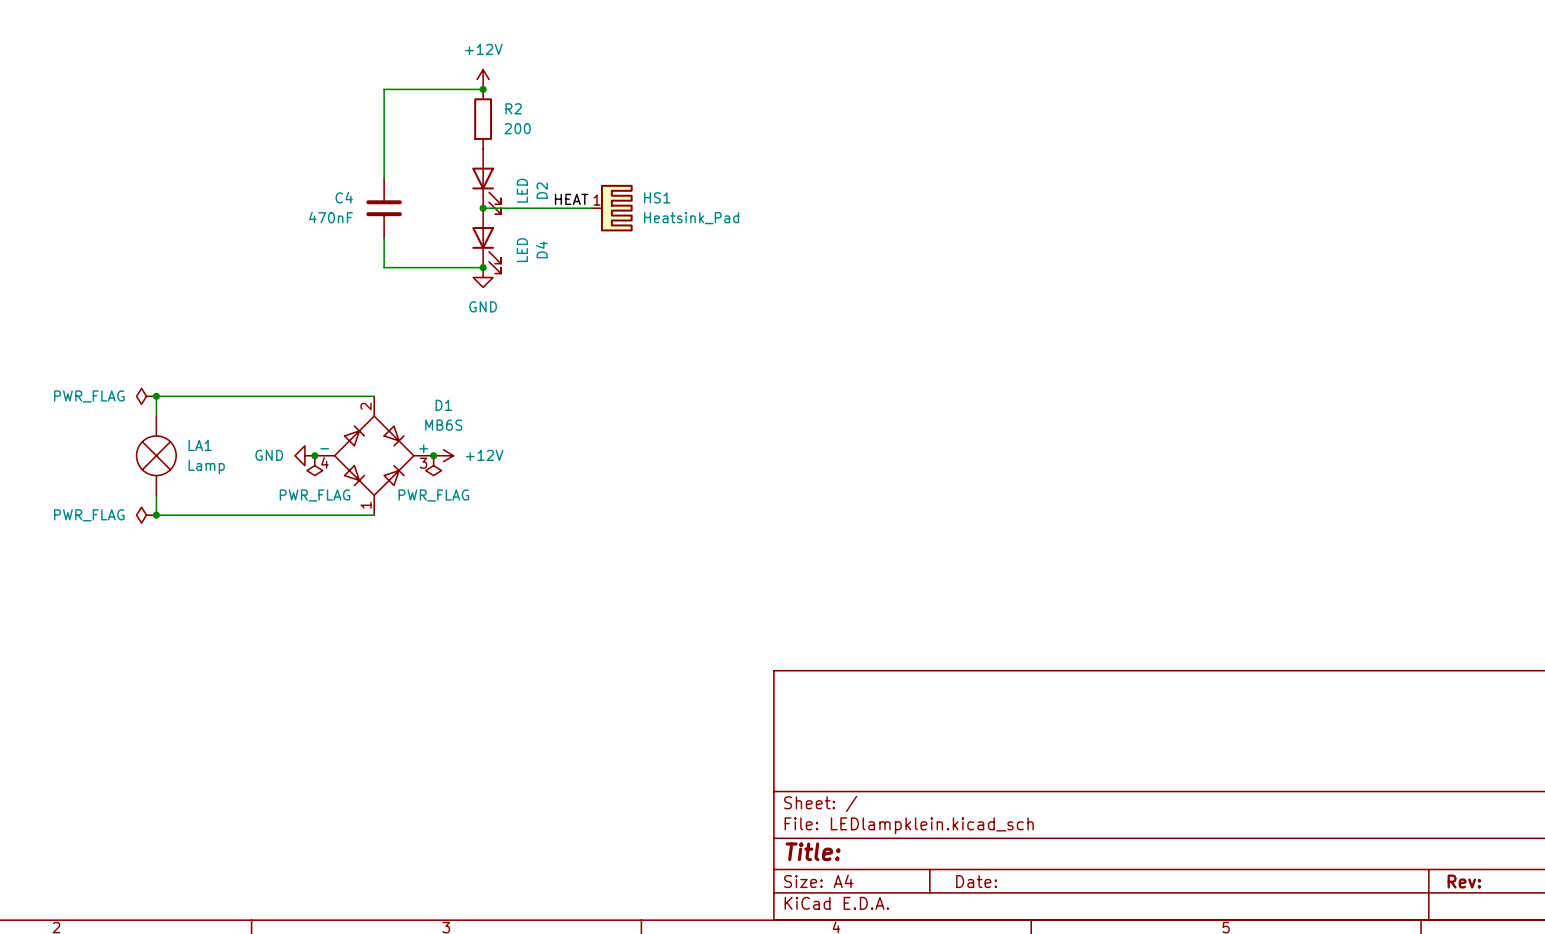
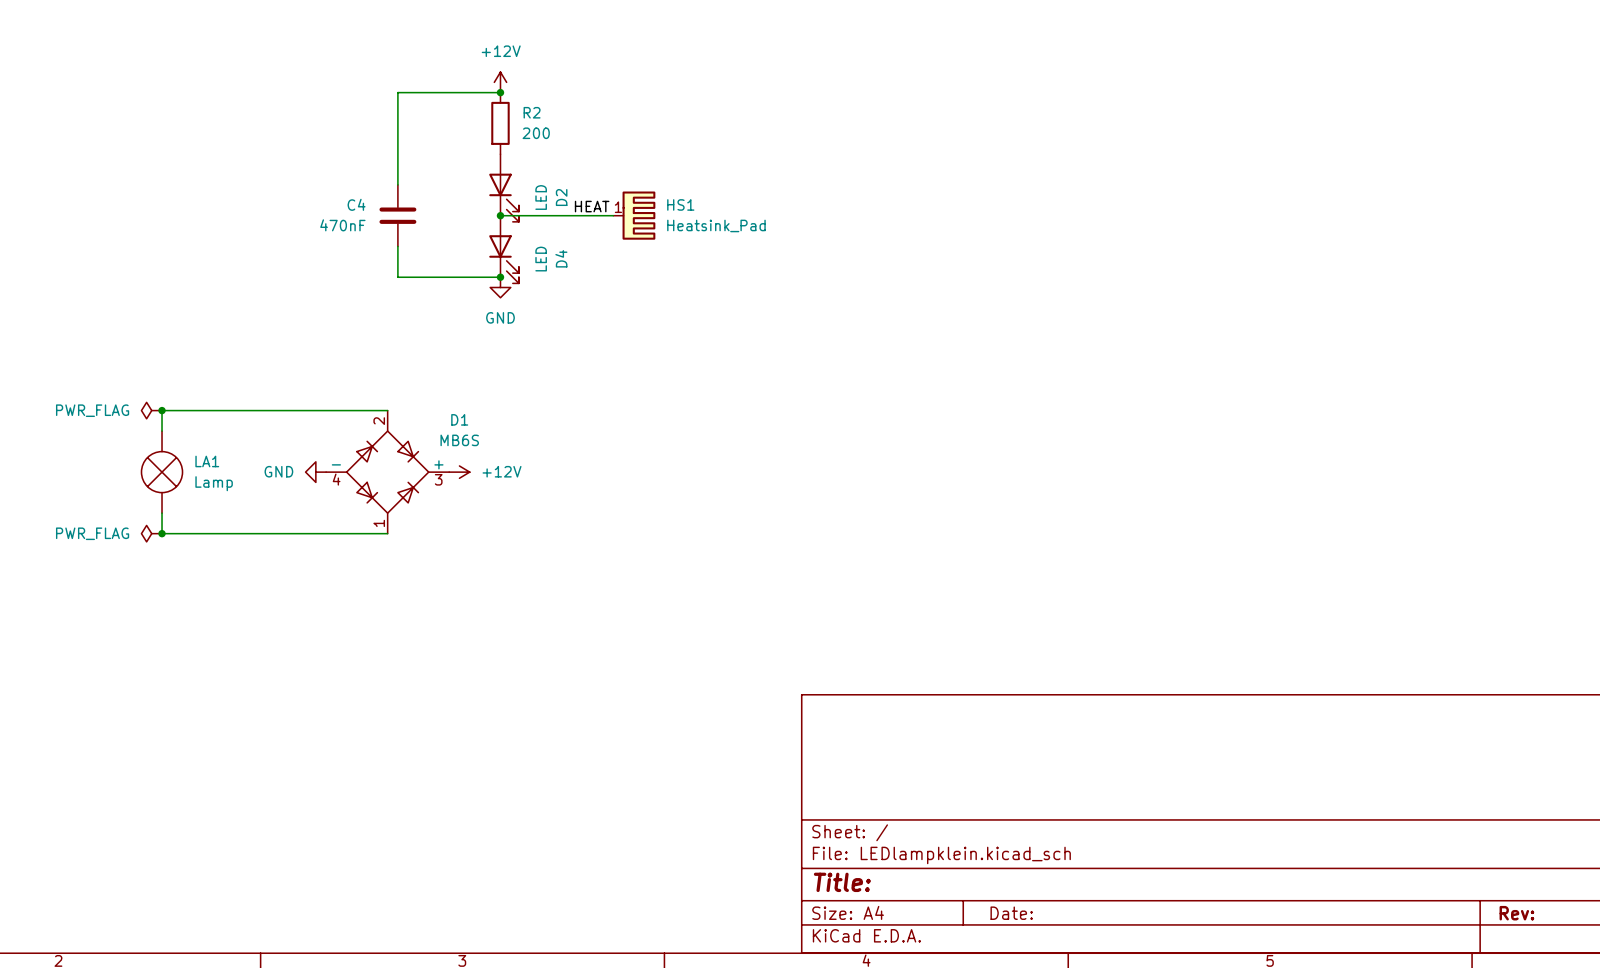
junction: (314, 455) -> none
junction: (433, 455) -> none
power symbol: PWR_FLAG (314, 465) -> none
power symbol: PWR_FLAG (433, 465) -> none

